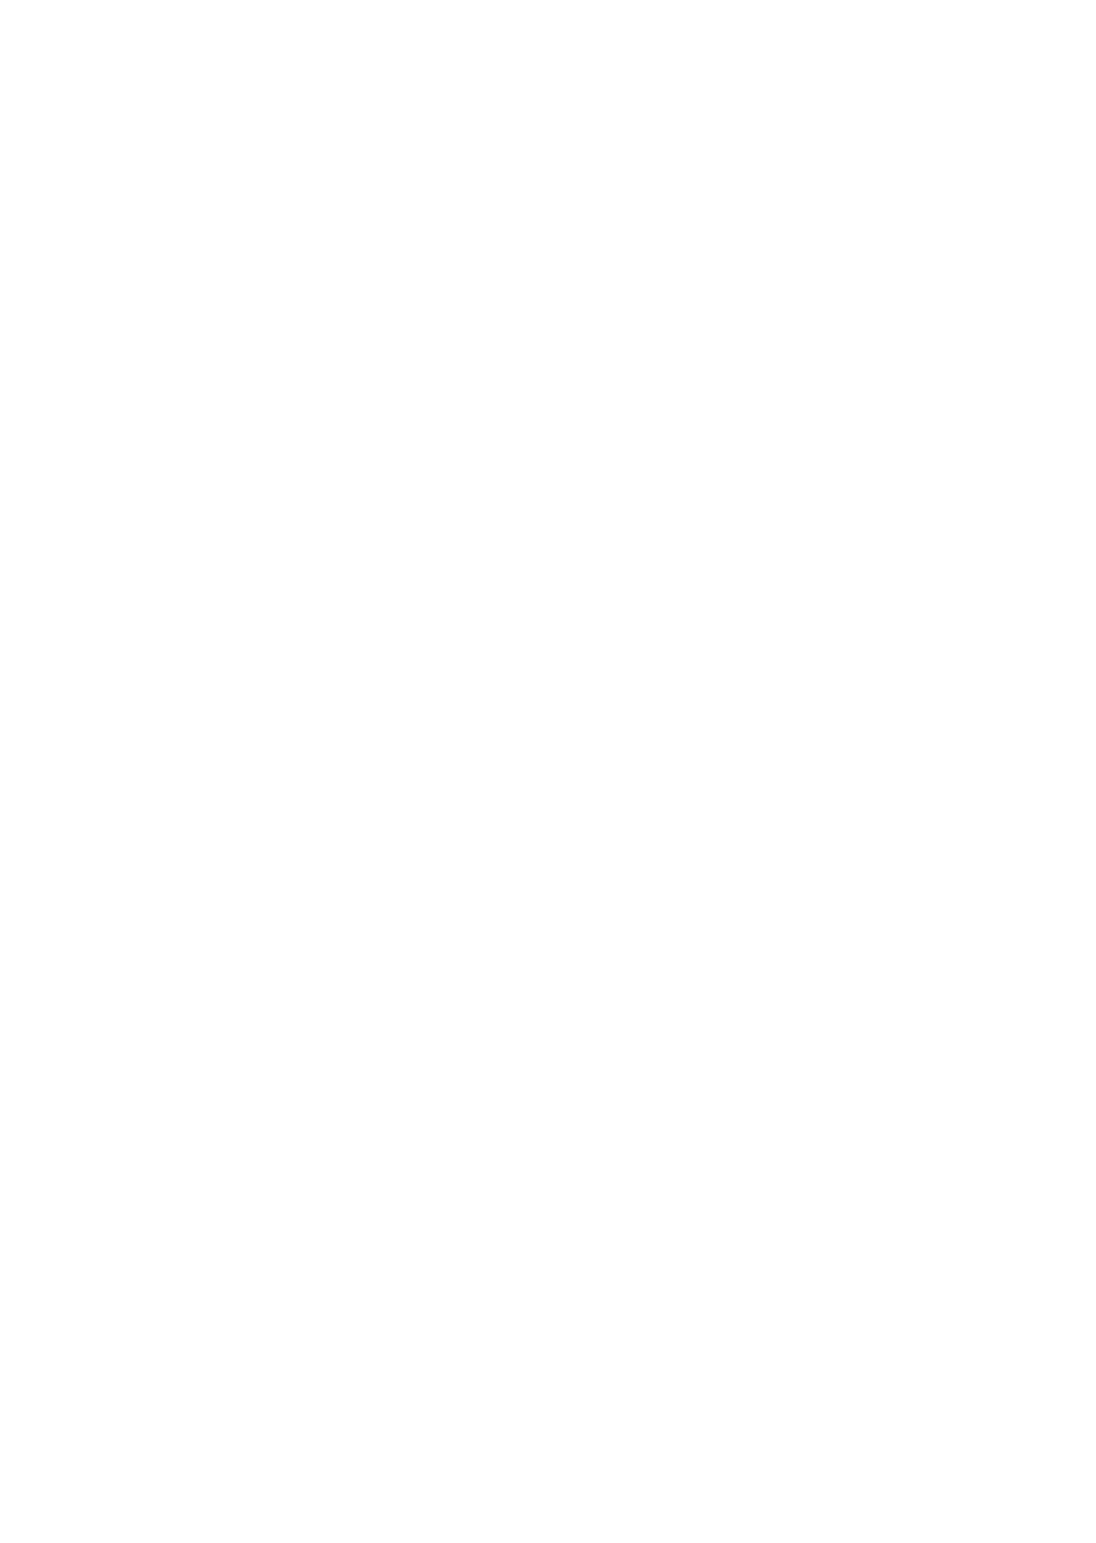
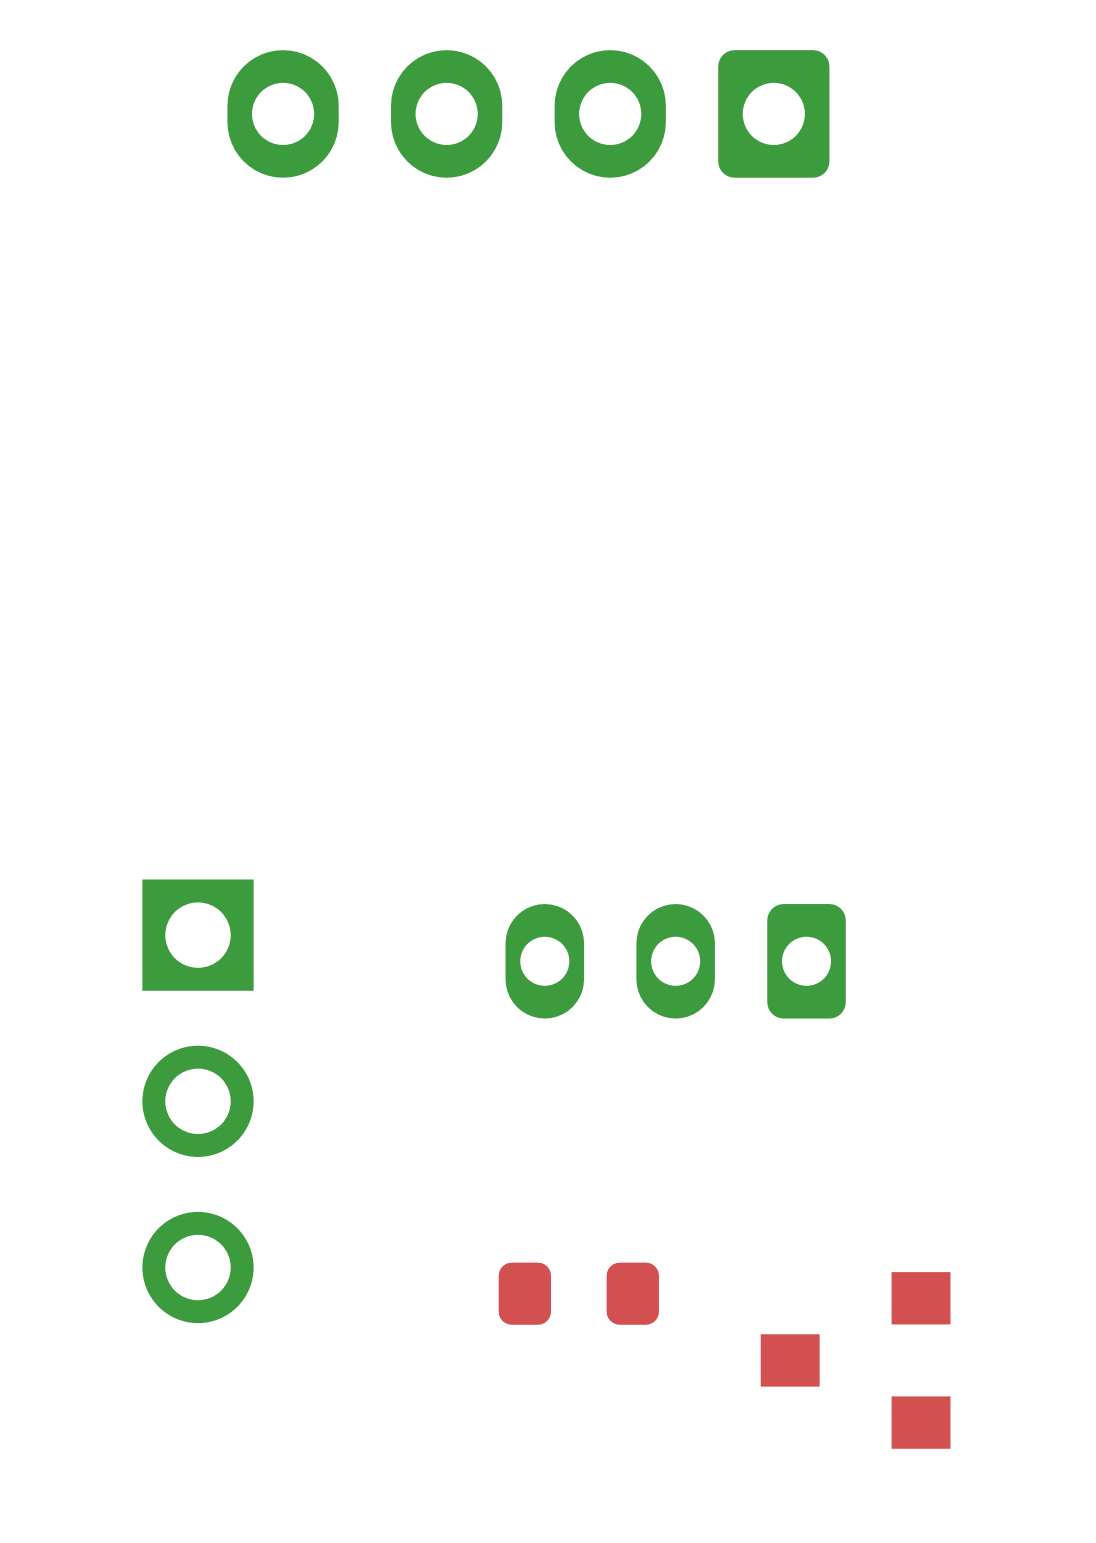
part: none -> (528, 113)
part: none -> (675, 961)
part: none -> (198, 1101)
part: none -> (578, 1293)
part: none -> (855, 1360)

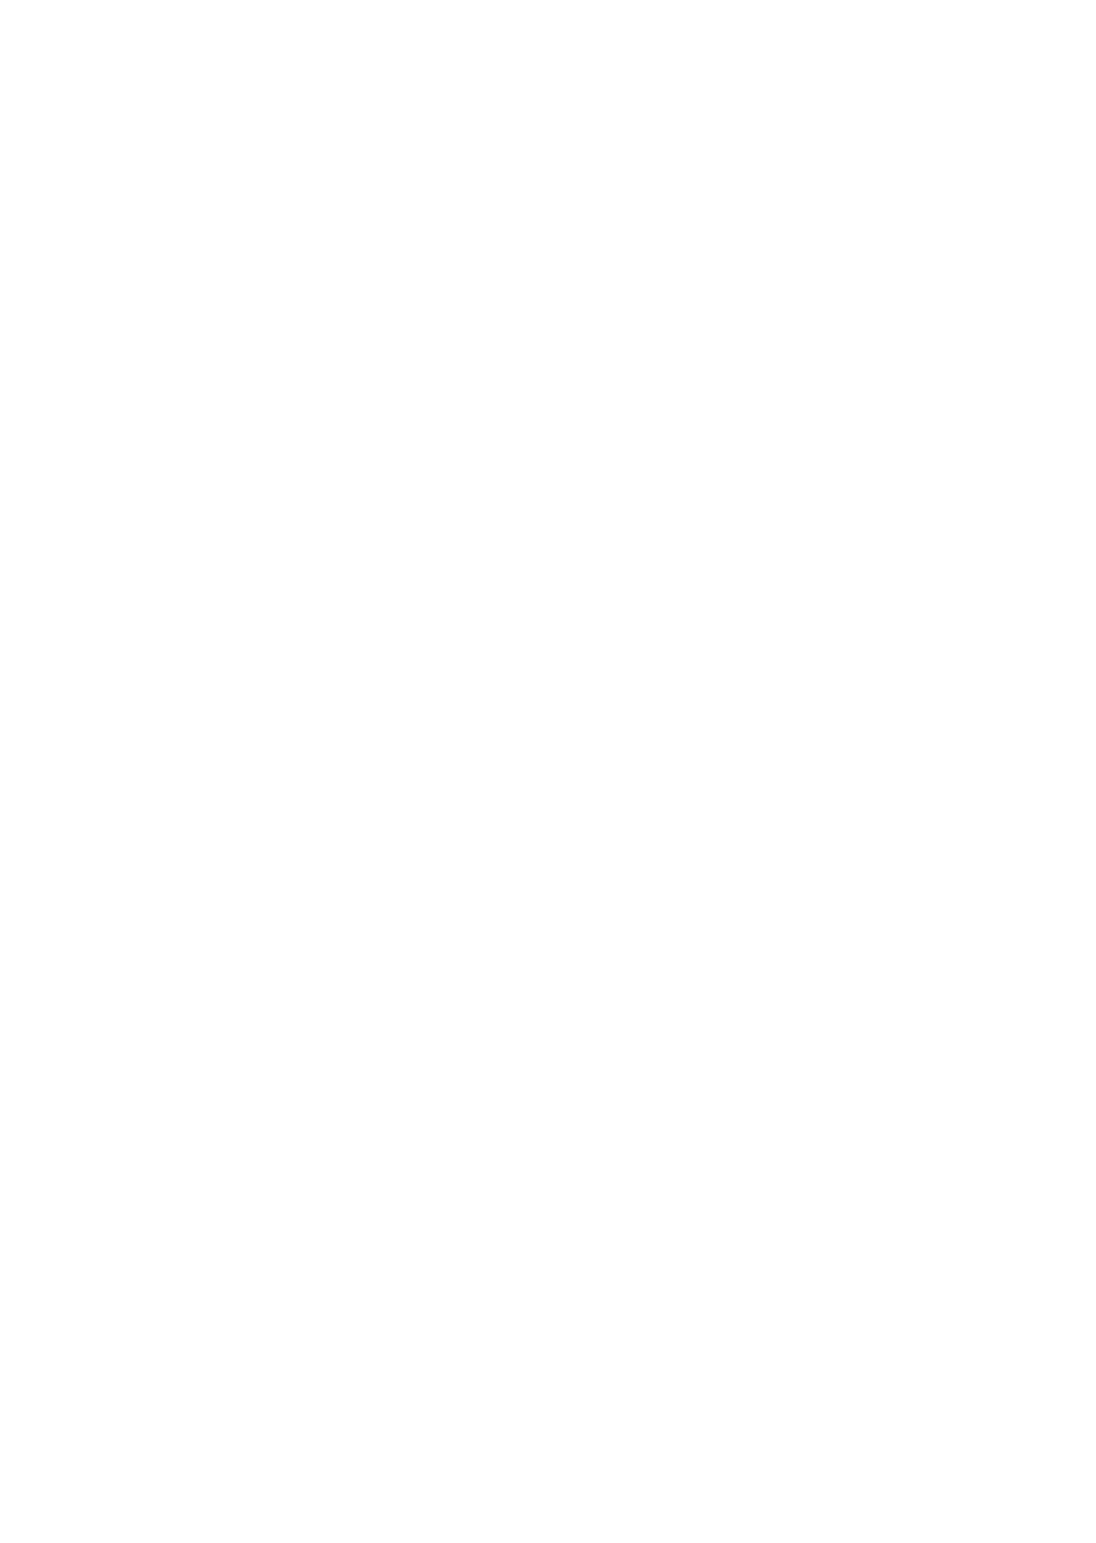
part: (528, 113) -> none
part: (675, 961) -> none
part: (198, 1101) -> none
part: (578, 1293) -> none
part: (855, 1360) -> none

